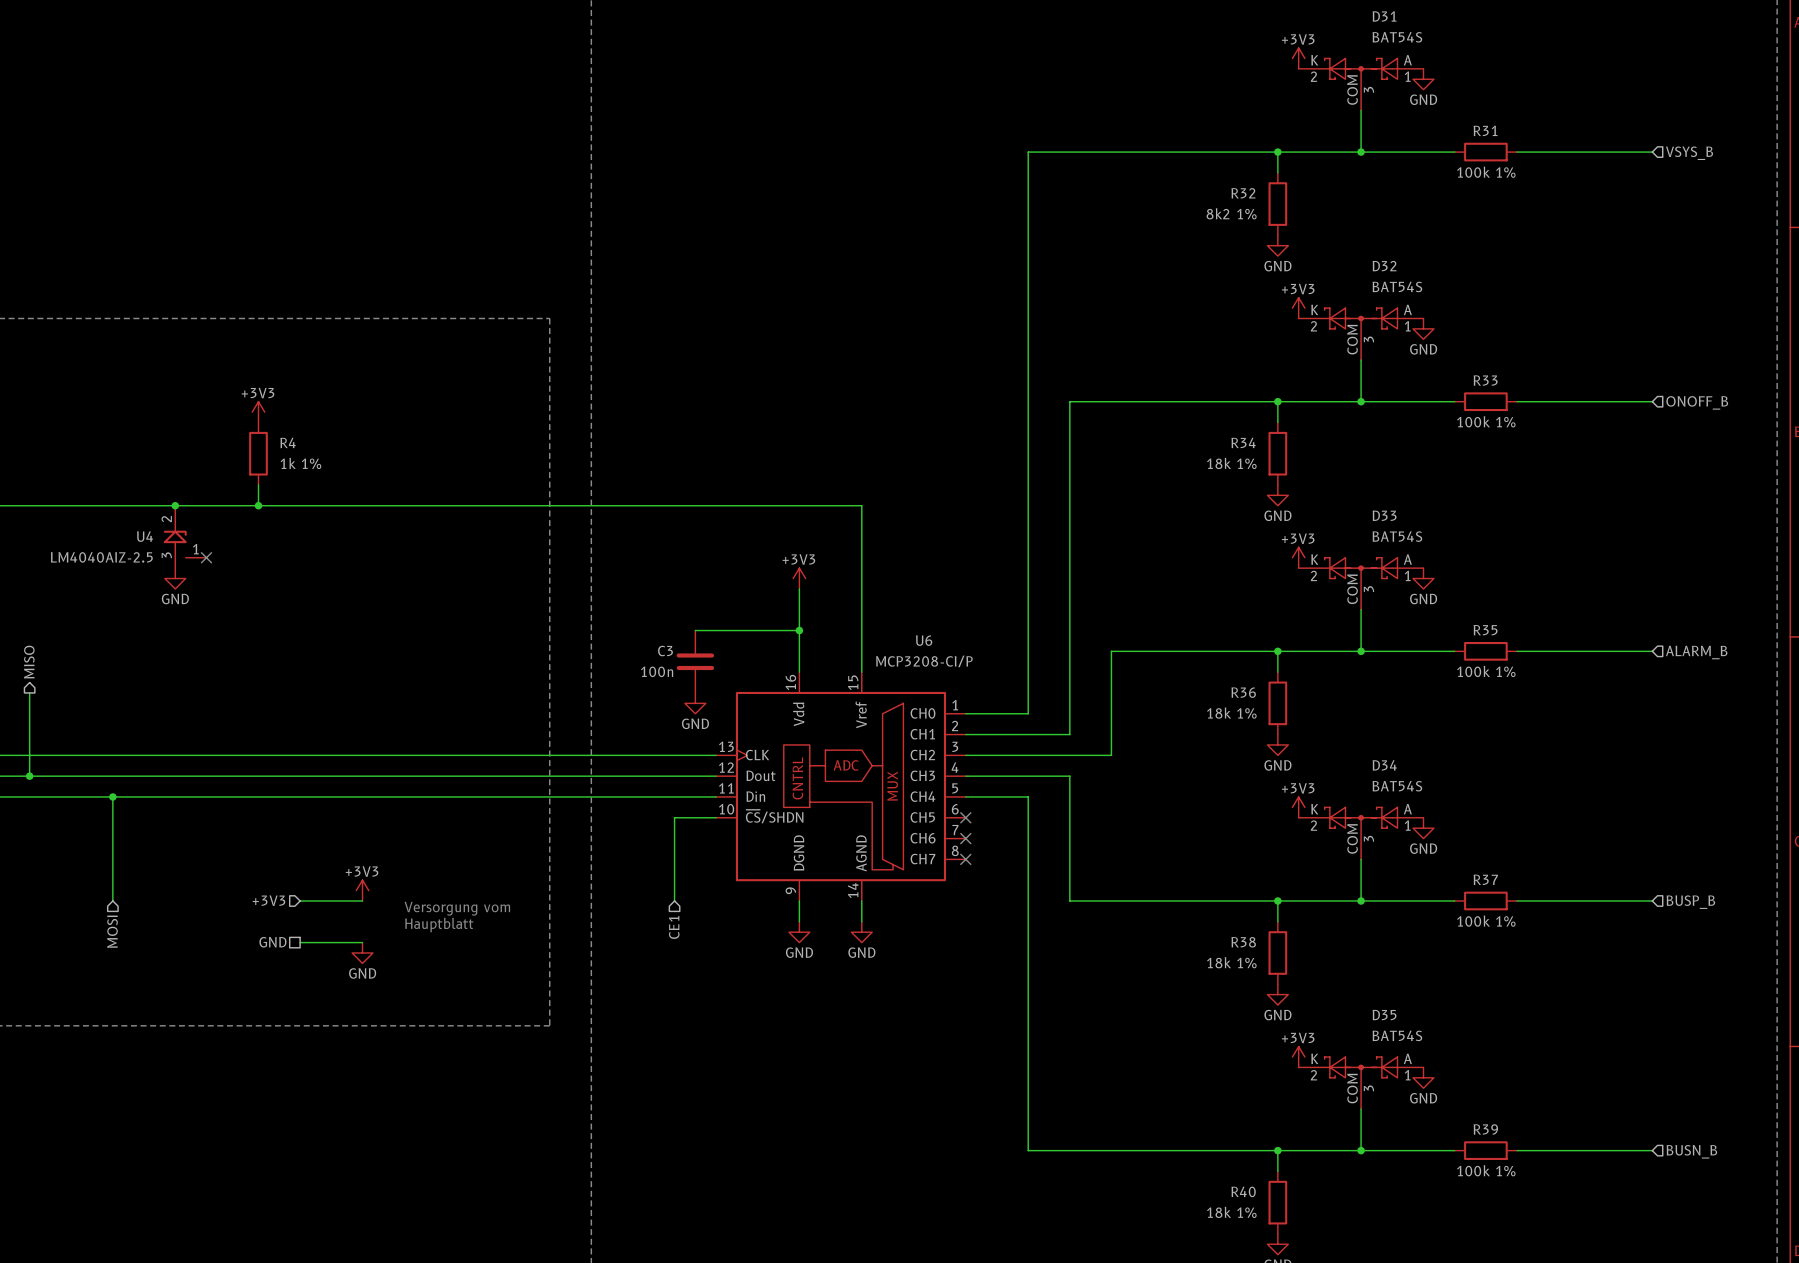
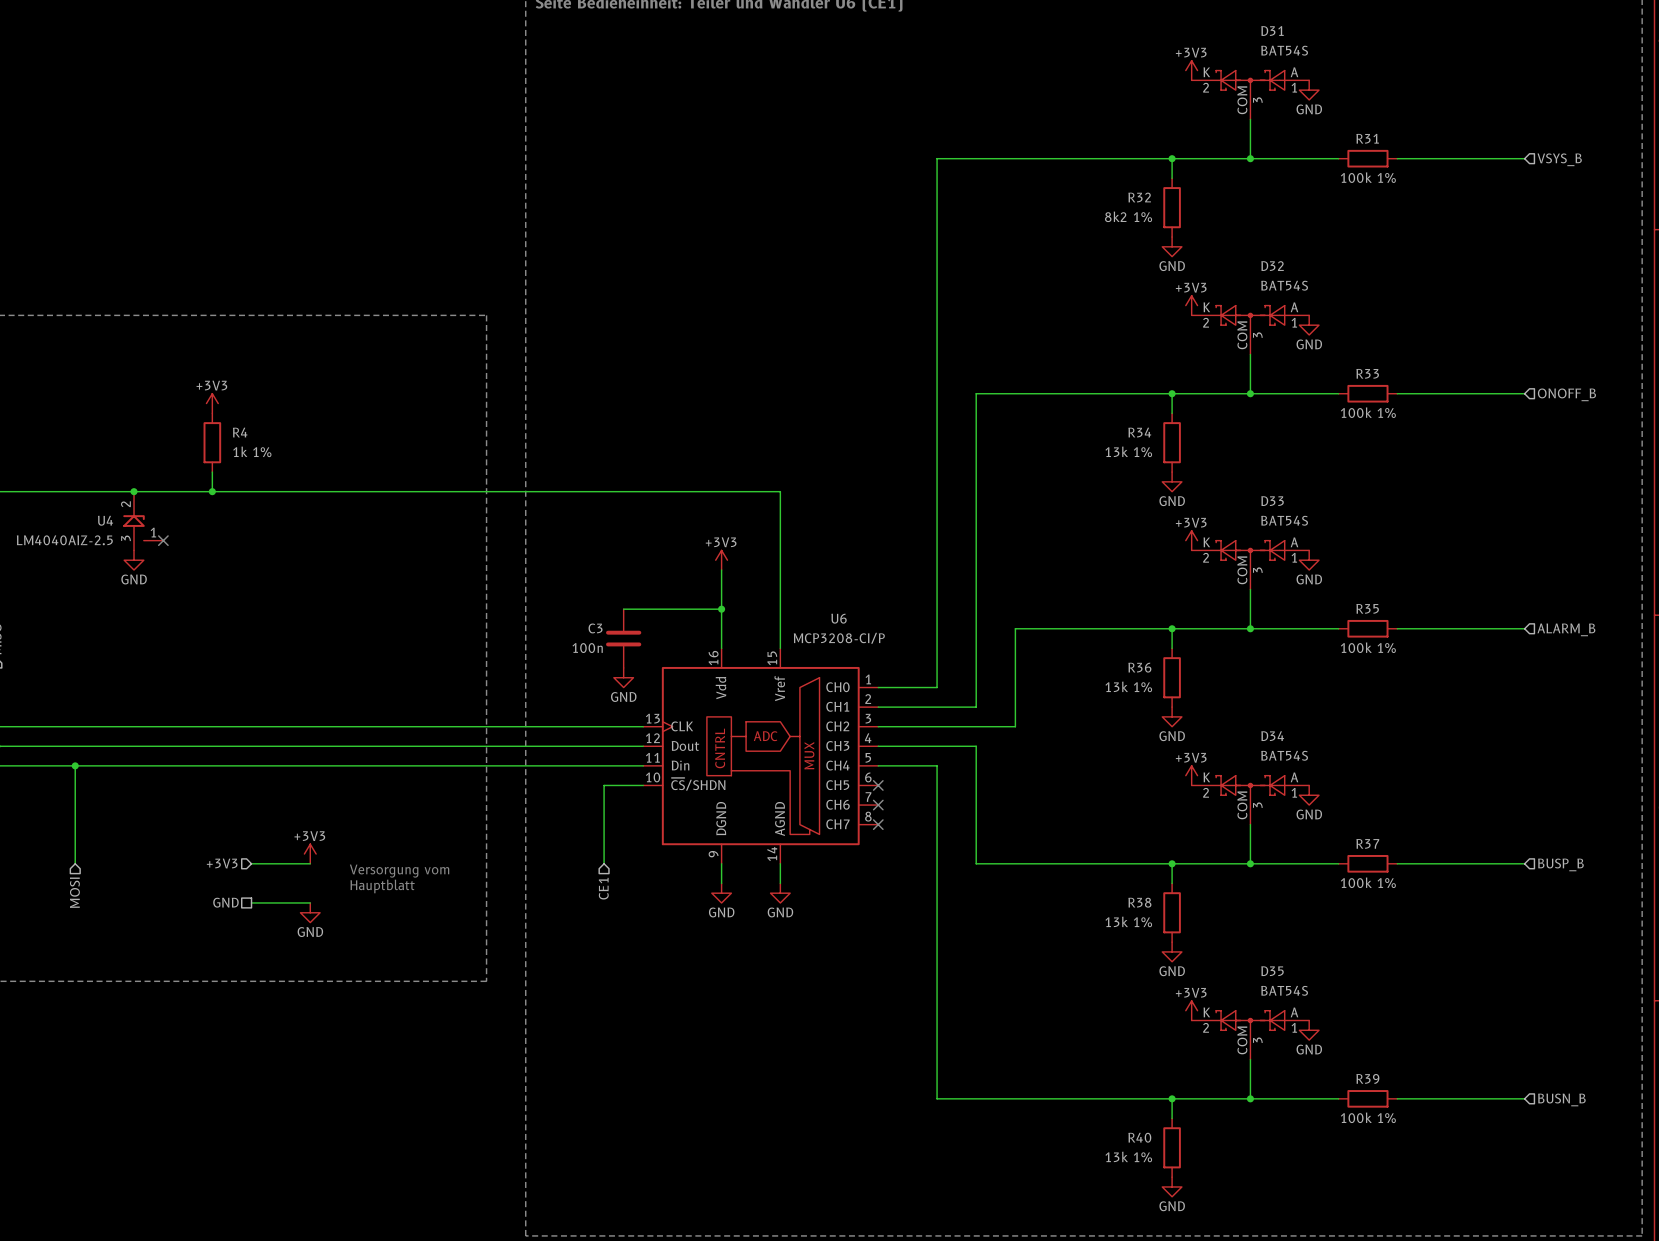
R34 value: 18k 1% (1231, 463) -> 13k 1% (1128, 451)
R36 value: 18k 1% (1231, 713) -> 13k 1% (1128, 686)
R38 value: 18k 1% (1231, 962) -> 13k 1% (1128, 921)
R40 value: 18k 1% (1231, 1212) -> 13k 1% (1128, 1156)

